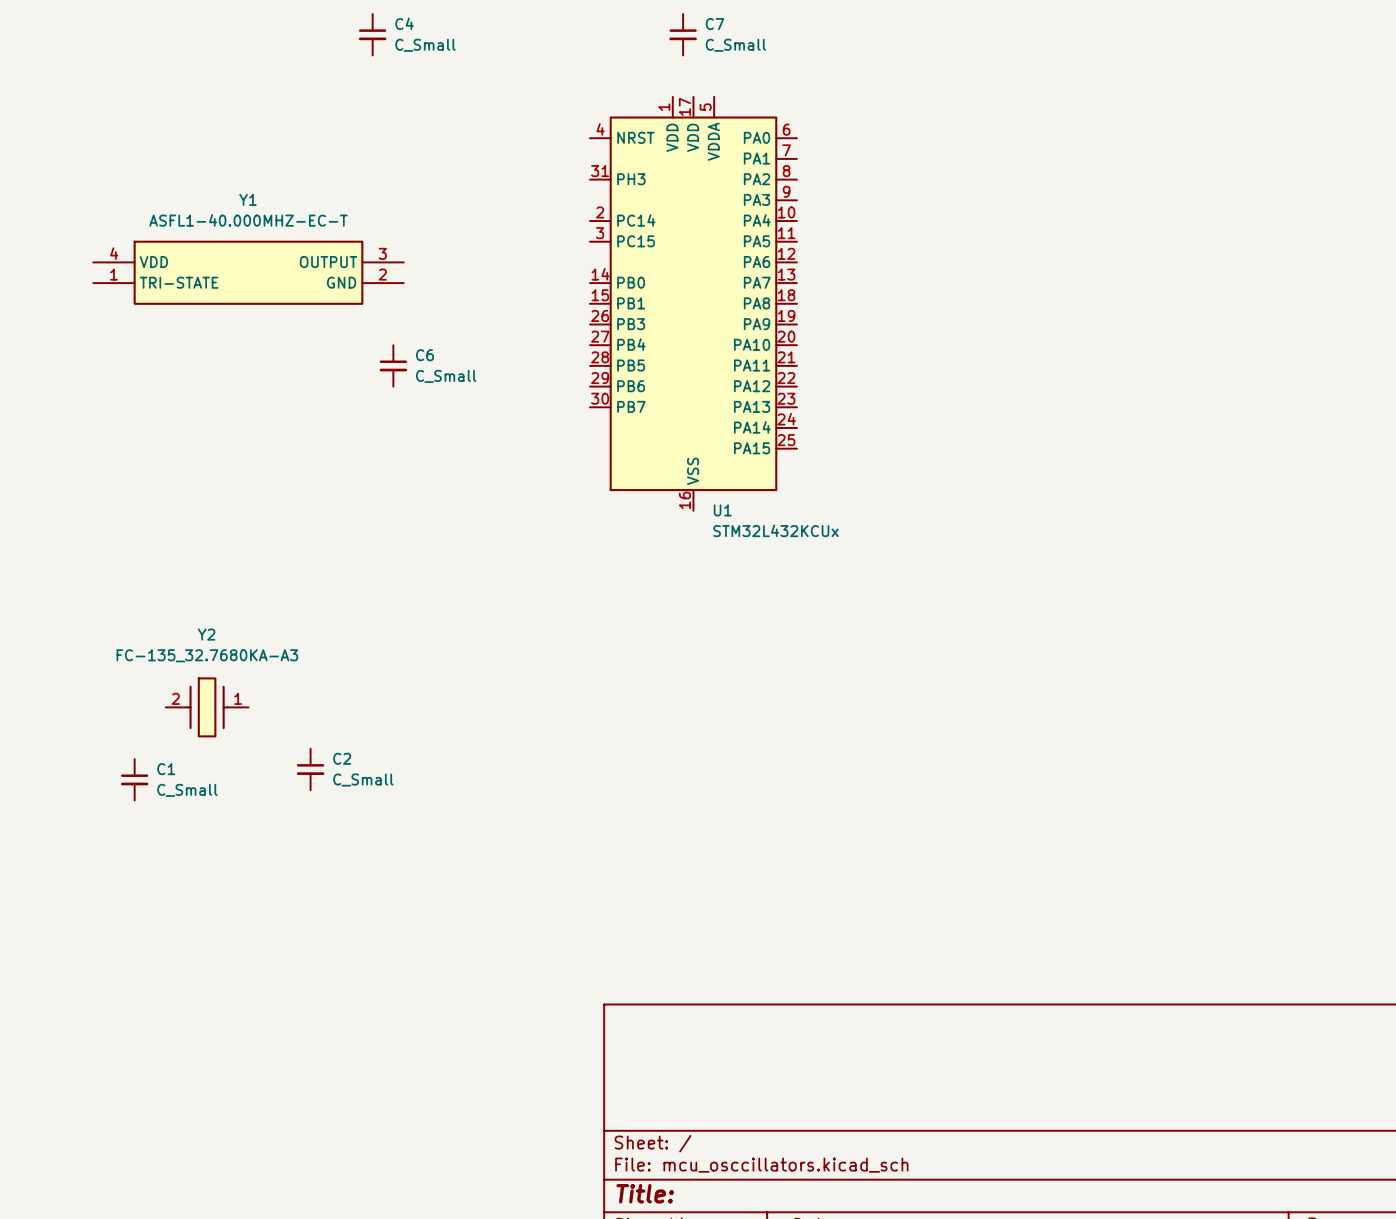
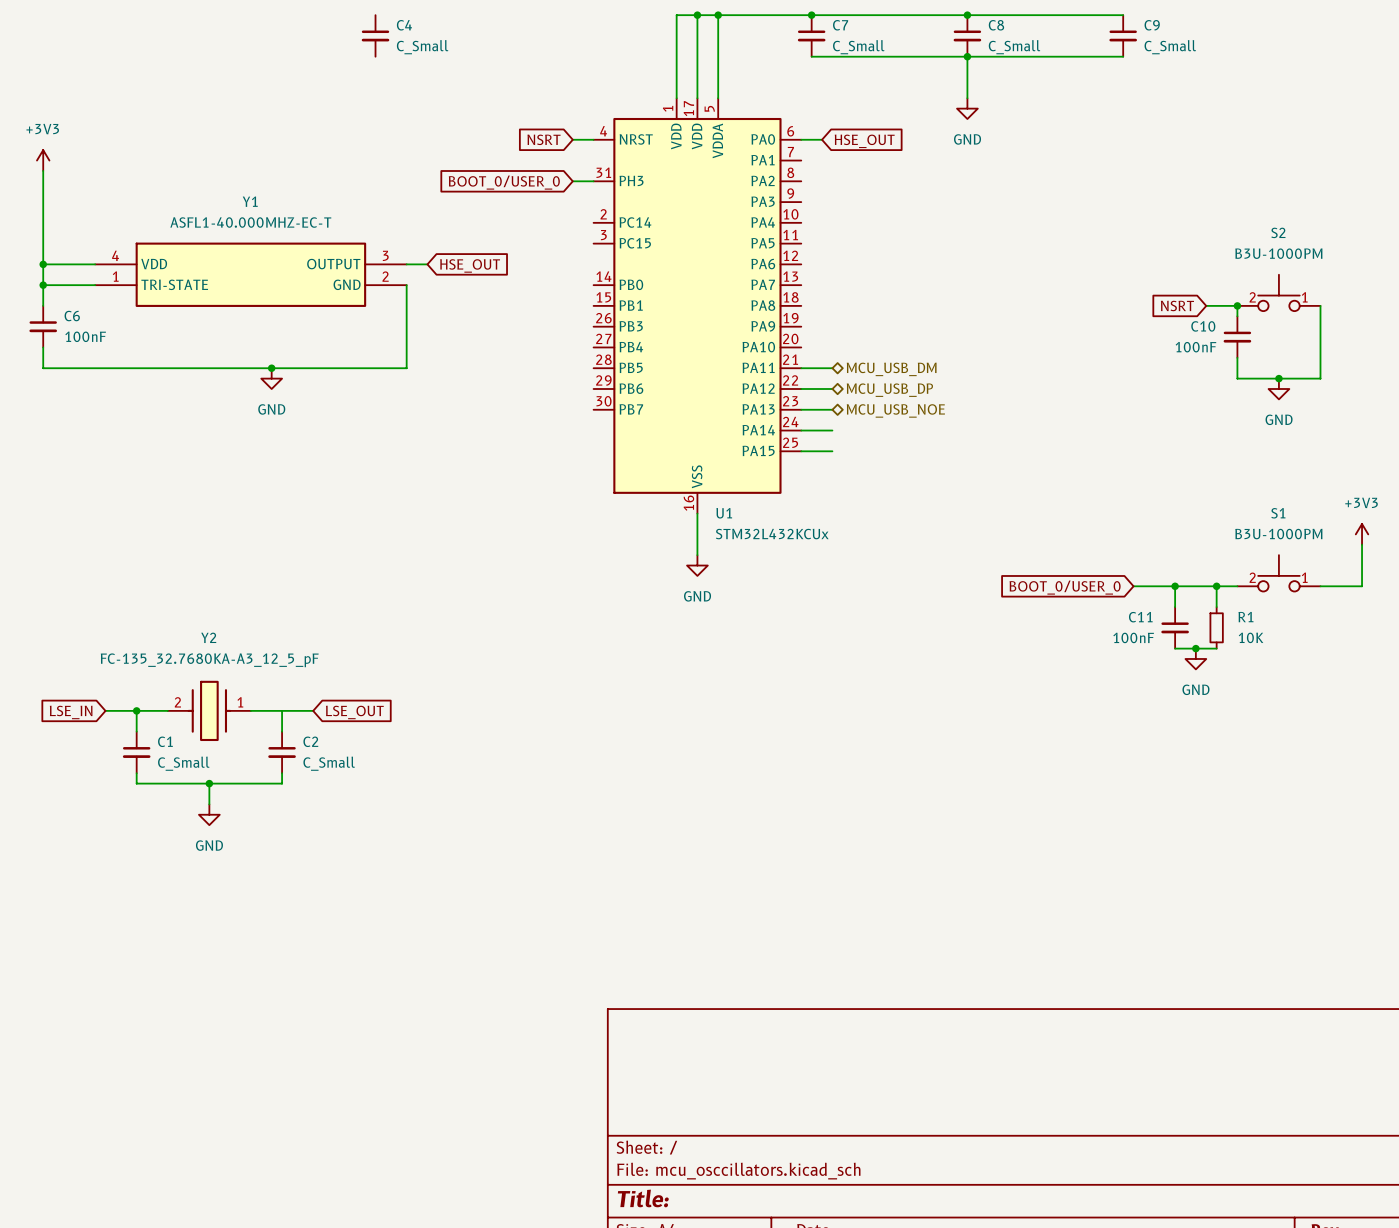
wire: none -> (697, 15) (697, 98)
junction: none -> (697, 15)
wire: none -> (718, 15) (718, 98)
junction: none -> (718, 15)
junction: none -> (811, 15)
junction: none -> (967, 15)
wire: none -> (1123, 15) (676, 15) (676, 98)
C7 position: (683, 34) -> (811, 35)
C8: none -> C_Small (967, 35)
C9: none -> C_Small (1123, 35)
wire: none -> (811, 56) (1123, 56)
wire: none -> (967, 56) (967, 98)
junction: none -> (967, 56)
power symbol: none -> GND (967, 108)
global label: none -> NSRT (544, 139)
wire: none -> (572, 139) (593, 139)
wire: none -> (801, 139) (822, 139)
global label: none -> HSE_OUT (864, 141)
power symbol: none -> +3V3 (43, 160)
wire: none -> (43, 170) (43, 305)
wire: none -> (572, 181) (593, 181)
global label: none -> BOOT_0/USER_0 (504, 182)
wire: none -> (43, 264) (95, 264)
junction: none -> (43, 264)
wire: none -> (406, 264) (427, 264)
global label: none -> HSE_OUT (470, 265)
wire: none -> (43, 285) (95, 285)
junction: none -> (43, 285)
wire: none -> (406, 285) (406, 368) (43, 368) (43, 347)
S2: none -> B3U-1000PM (1278, 292)
global label: none -> NSRT (1177, 305)
wire: none -> (1206, 305) (1237, 305) (1237, 316)
junction: none -> (1237, 305)
wire: none -> (1320, 305) (1320, 378) (1237, 378) (1237, 357)
C10: none -> 100nF (1237, 337)
junction: none -> (271, 368)
C6 position: (393, 365) -> (43, 326)
wire: none -> (801, 368) (832, 368)
hierarchical label: none -> MCU_USB_DM (891, 369)
power symbol: none -> GND (271, 378)
C6 value: C_Small (446, 376) -> 100nF (85, 336)
junction: none -> (1278, 378)
wire: none -> (801, 388) (832, 388)
hierarchical label: none -> MCU_USB_DP (889, 390)
power symbol: none -> GND (1278, 388)
wire: none -> (801, 409) (832, 409)
hierarchical label: none -> MCU_USB_NOE (895, 410)
wire: none -> (801, 430) (832, 430)
wire: none -> (801, 451) (832, 451)
wire: none -> (697, 513) (697, 555)
power symbol: none -> +3V3 (1362, 534)
wire: none -> (1362, 544) (1362, 586) (1320, 586)
power symbol: none -> GND (697, 565)
S1: none -> B3U-1000PM (1278, 573)
wire: none -> (1133, 586) (1237, 586)
wire: none -> (1175, 586) (1175, 607)
junction: none -> (1175, 586)
wire: none -> (1216, 586) (1216, 607)
junction: none -> (1216, 586)
global label: none -> BOOT_0/USER_0 (1065, 587)
C11: none -> 100nF (1175, 627)
R1: none -> 10K (1216, 627)
wire: none -> (1175, 648) (1216, 648)
junction: none -> (1195, 648)
Y2 value: FC-135_32.7680KA-A3 (207, 655) -> FC-135_32.7680KA-A3_12_5_pF (209, 660)
power symbol: none -> GND (1195, 658)
global label: none -> LSE_IN (71, 712)
wire: none -> (105, 710) (167, 710)
wire: none -> (136, 710) (136, 731)
junction: none -> (136, 710)
wire: none -> (250, 710) (313, 710)
wire: none -> (282, 710) (282, 731)
global label: none -> LSE_OUT (354, 712)
wire: none -> (136, 773) (136, 783) (282, 783) (282, 773)
C2 position: (310, 769) -> (282, 752)
C1 position: (134, 779) -> (136, 752)
wire: none -> (209, 783) (209, 804)
junction: none -> (209, 783)
power symbol: none -> GND (209, 814)

